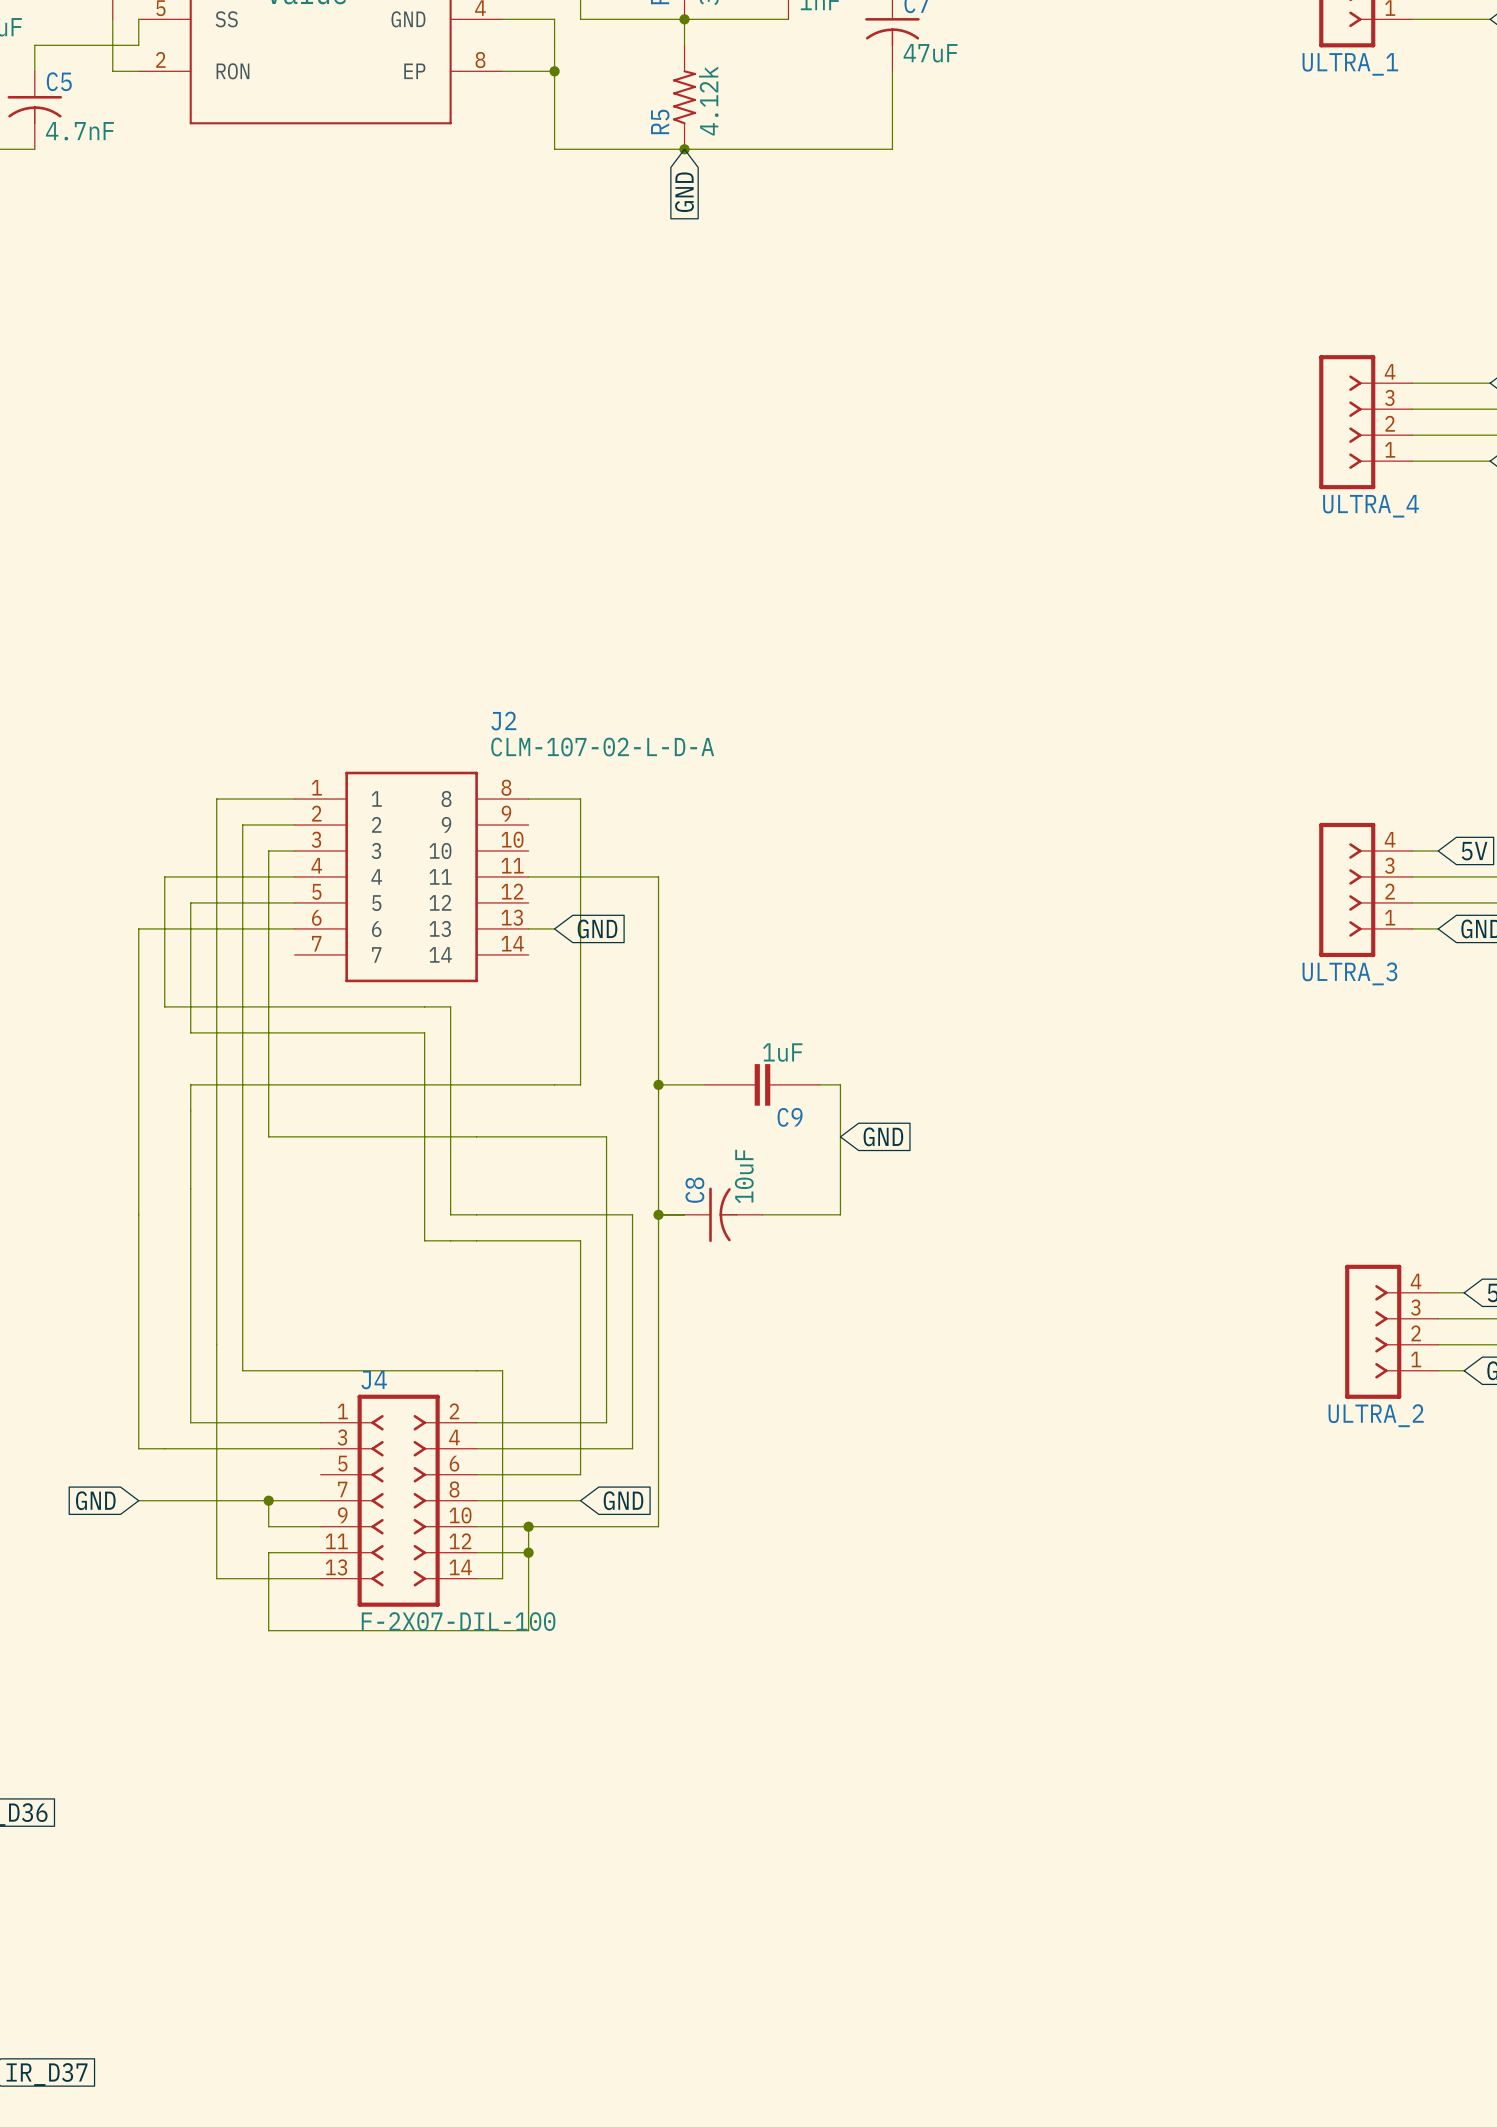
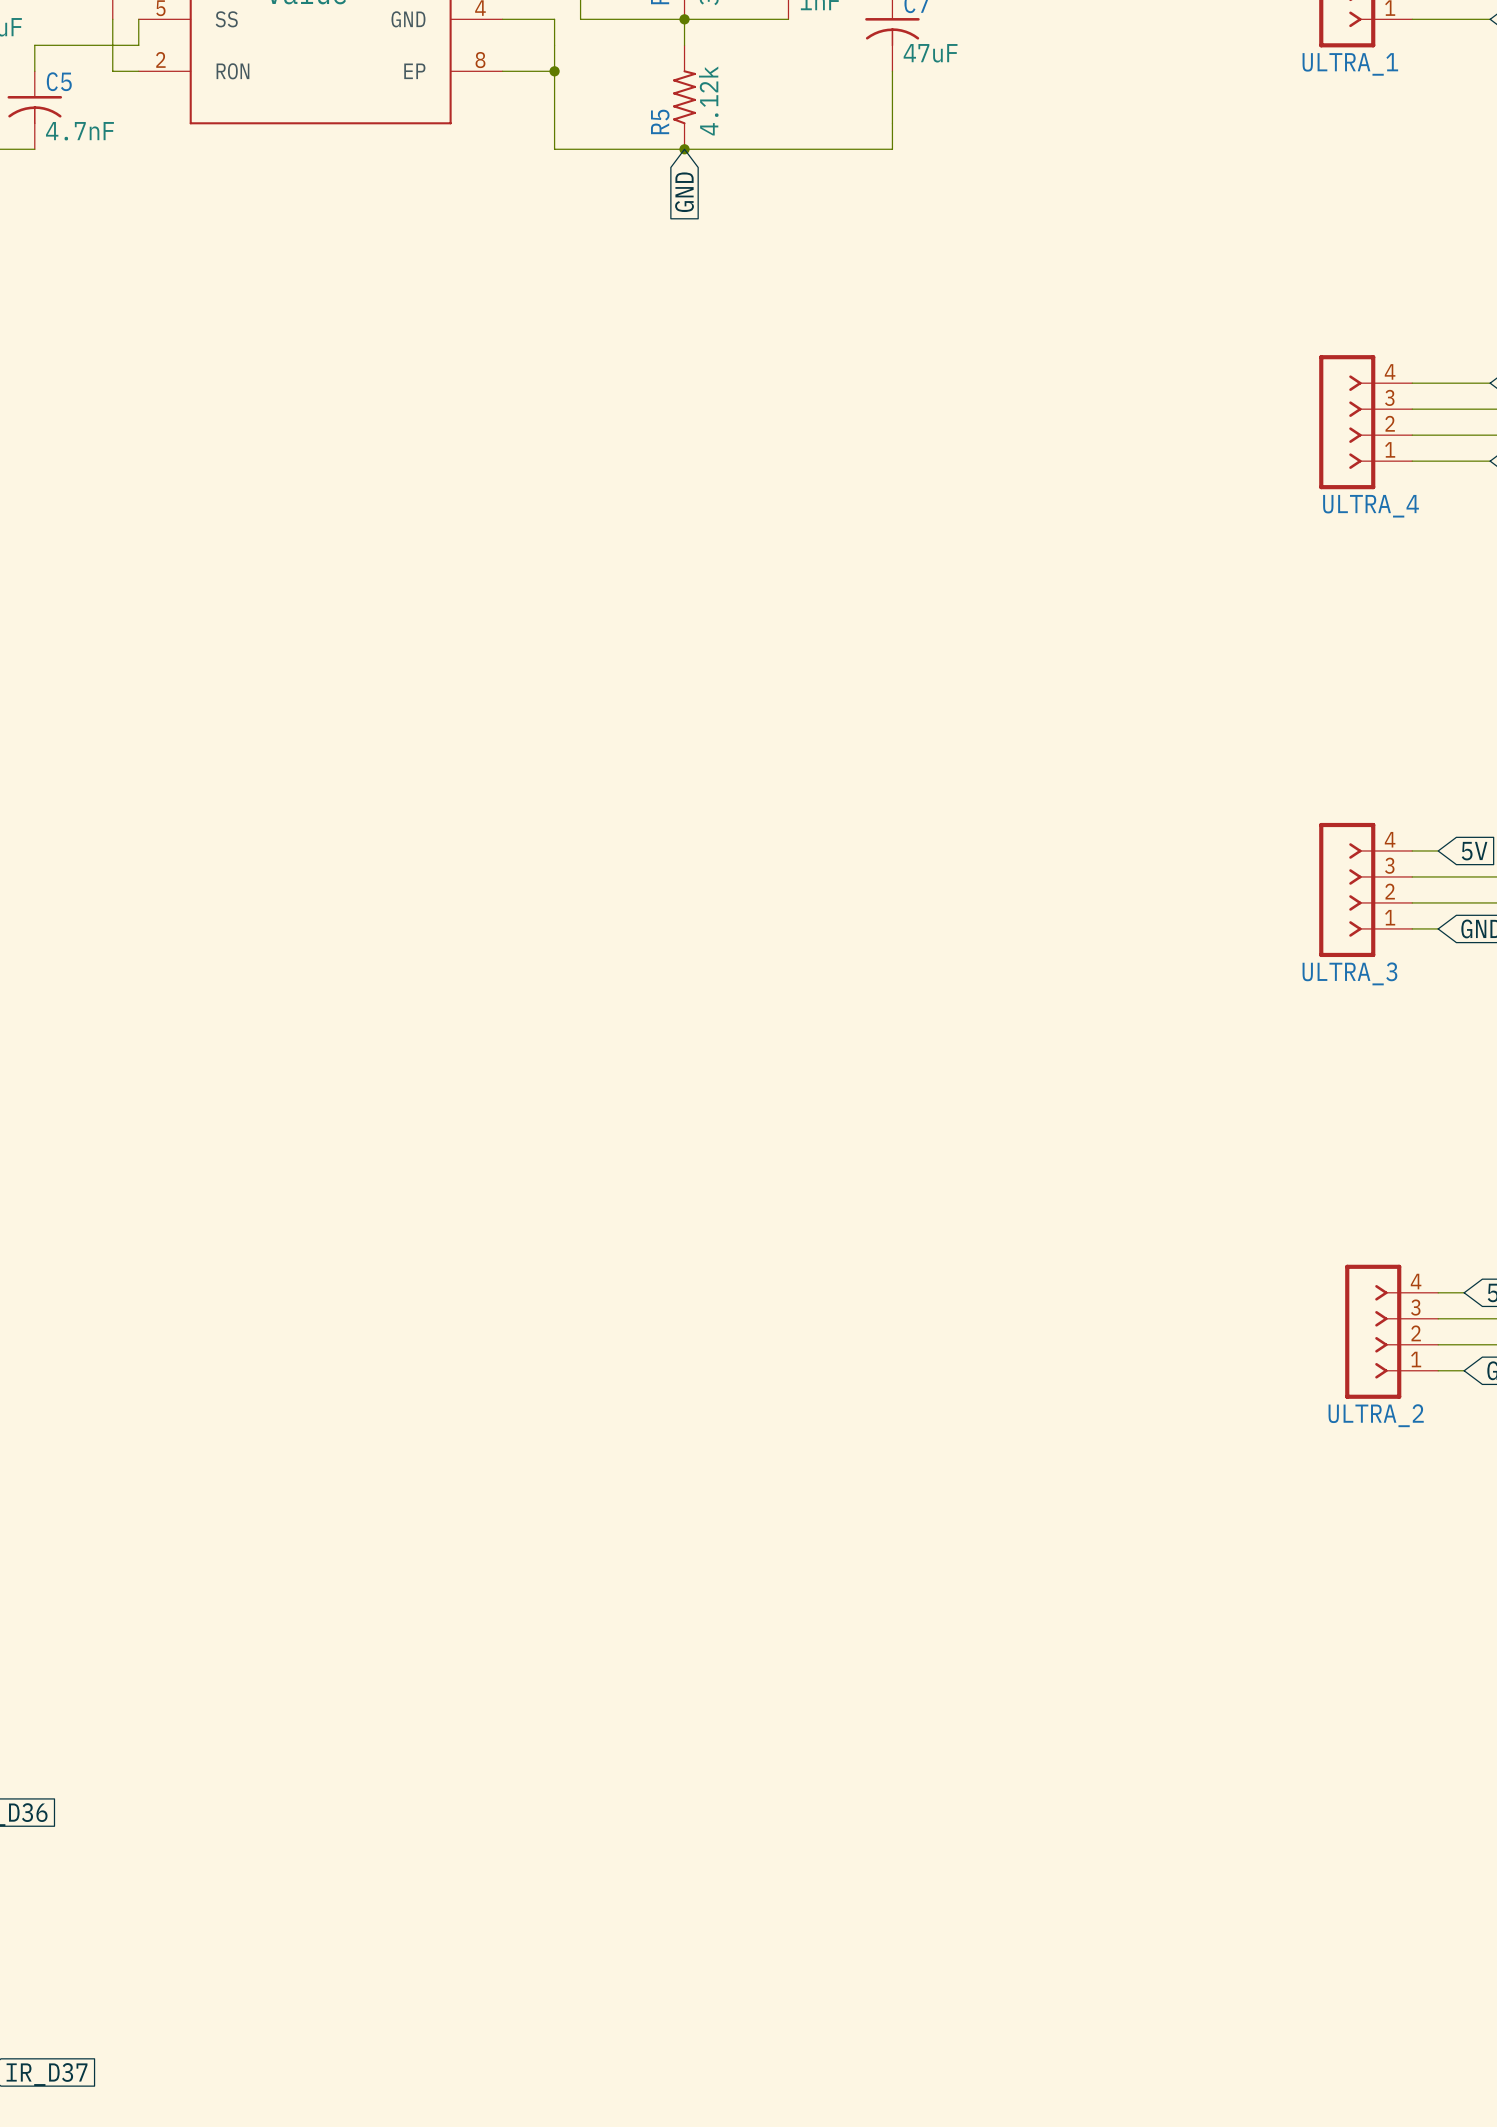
wire: (294, 799) (216, 799) (216, 1578) (320, 1578) -> none
wire: (528, 799) (580, 799) (580, 1084) (190, 1084) (190, 1422) (320, 1422) -> none
wire: (294, 825) (242, 825) (242, 1370) (502, 1370) (502, 1578) (476, 1578) -> none
wire: (294, 850) (268, 850) (268, 1136) (606, 1136) (606, 1422) (476, 1422) -> none
wire: (294, 876) (164, 876) (164, 1006) (450, 1006) (450, 1214) (632, 1214) (632, 1448) (476, 1448) -> none
J2: CLM-107-02-L-D-A (411, 876) -> none
wire: (528, 876) (658, 876) (658, 1526) (476, 1526) -> none
wire: (294, 902) (190, 902) (190, 1032) (424, 1032) (424, 1240) (580, 1240) (580, 1474) (476, 1474) -> none
wire: (294, 928) (138, 928) (138, 1448) (320, 1448) -> none
wire: (528, 928) (554, 928) -> none
global label: GND (597, 928) -> none
wire: (658, 1084) (705, 1084) -> none
junction: (658, 1084) -> none
C9: 1uF (762, 1084) -> none
wire: (819, 1084) (840, 1084) (840, 1214) (762, 1214) -> none
global label: GND (883, 1136) -> none
wire: (658, 1214) (684, 1214) -> none
junction: (658, 1214) -> none
C8: 10uF (723, 1214) -> none
global label: GND (95, 1500) -> none
wire: (138, 1500) (320, 1500) -> none
wire: (268, 1500) (268, 1526) (320, 1526) -> none
junction: (268, 1500) -> none
J4: F-2X07-DIL-100 (398, 1500) -> none
wire: (476, 1500) (580, 1500) -> none
global label: GND (623, 1500) -> none
wire: (528, 1526) (528, 1630) (268, 1630) (268, 1552) (320, 1552) -> none
junction: (528, 1526) -> none
wire: (476, 1552) (528, 1552) -> none
junction: (528, 1552) -> none

